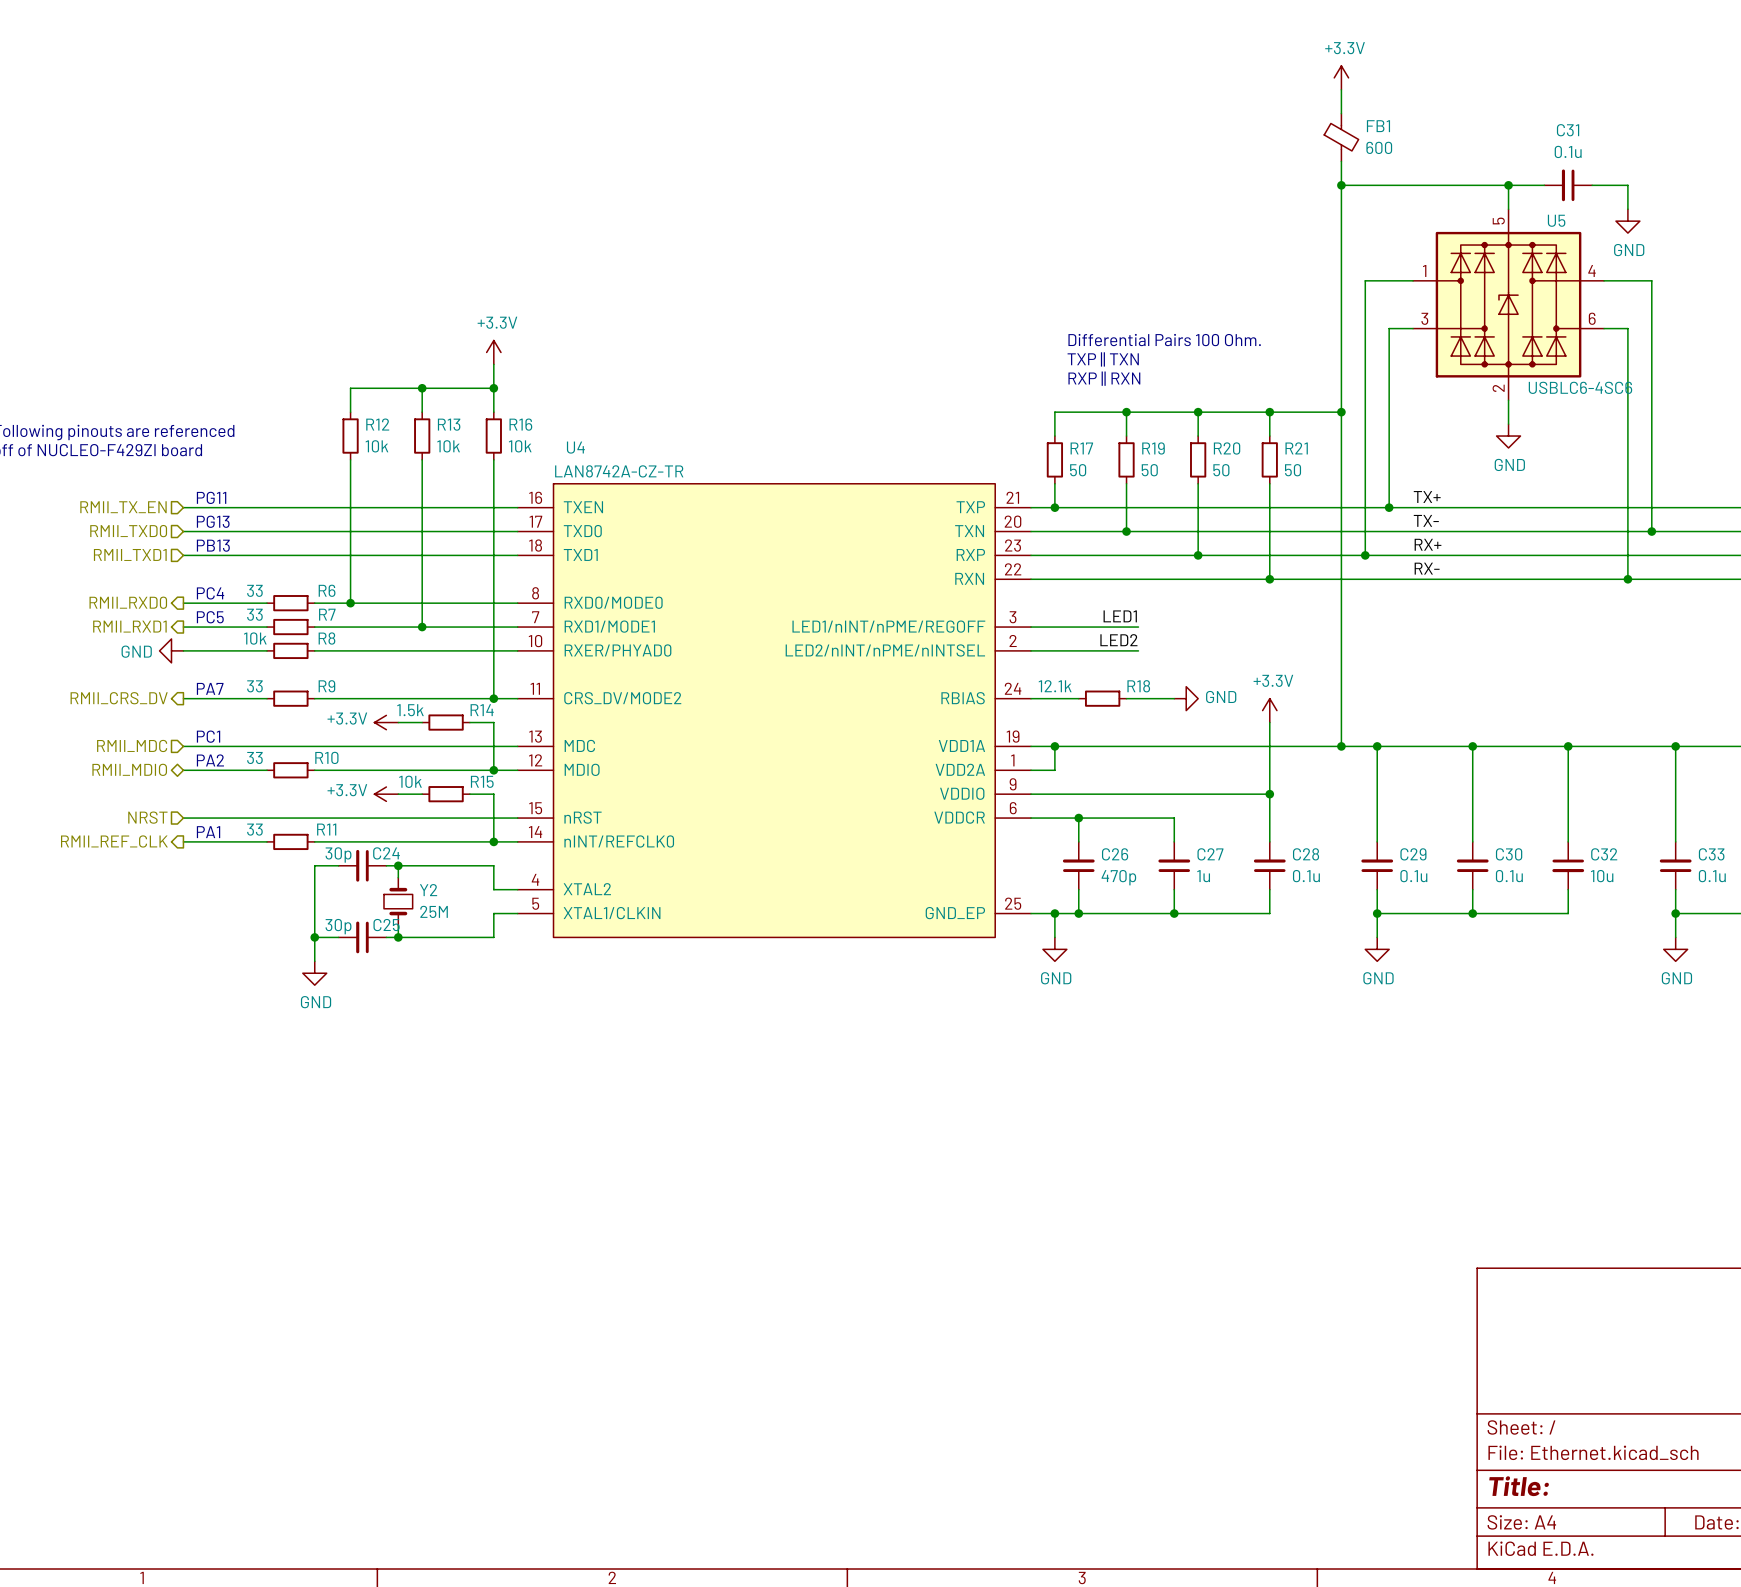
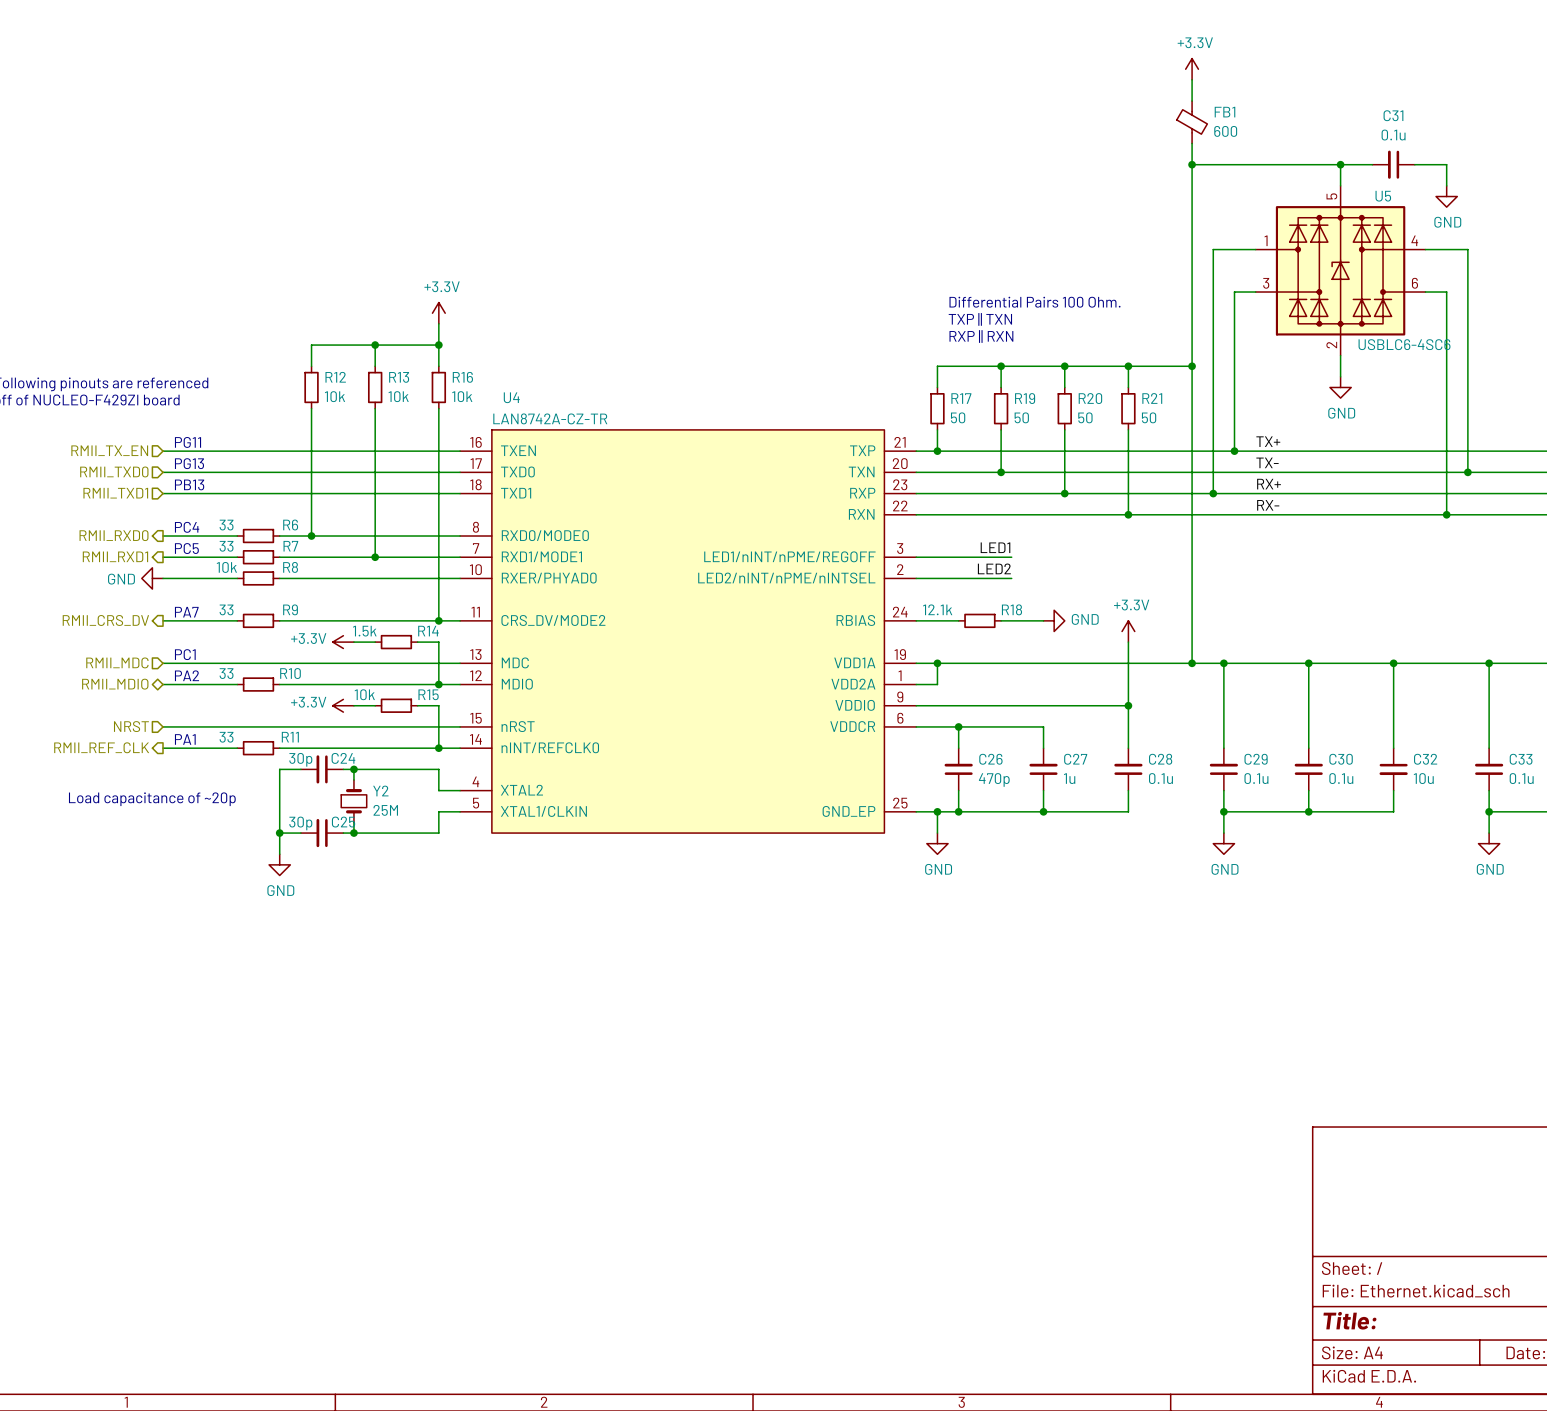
text: none -> Load capacitance of ~20p (152, 799)

